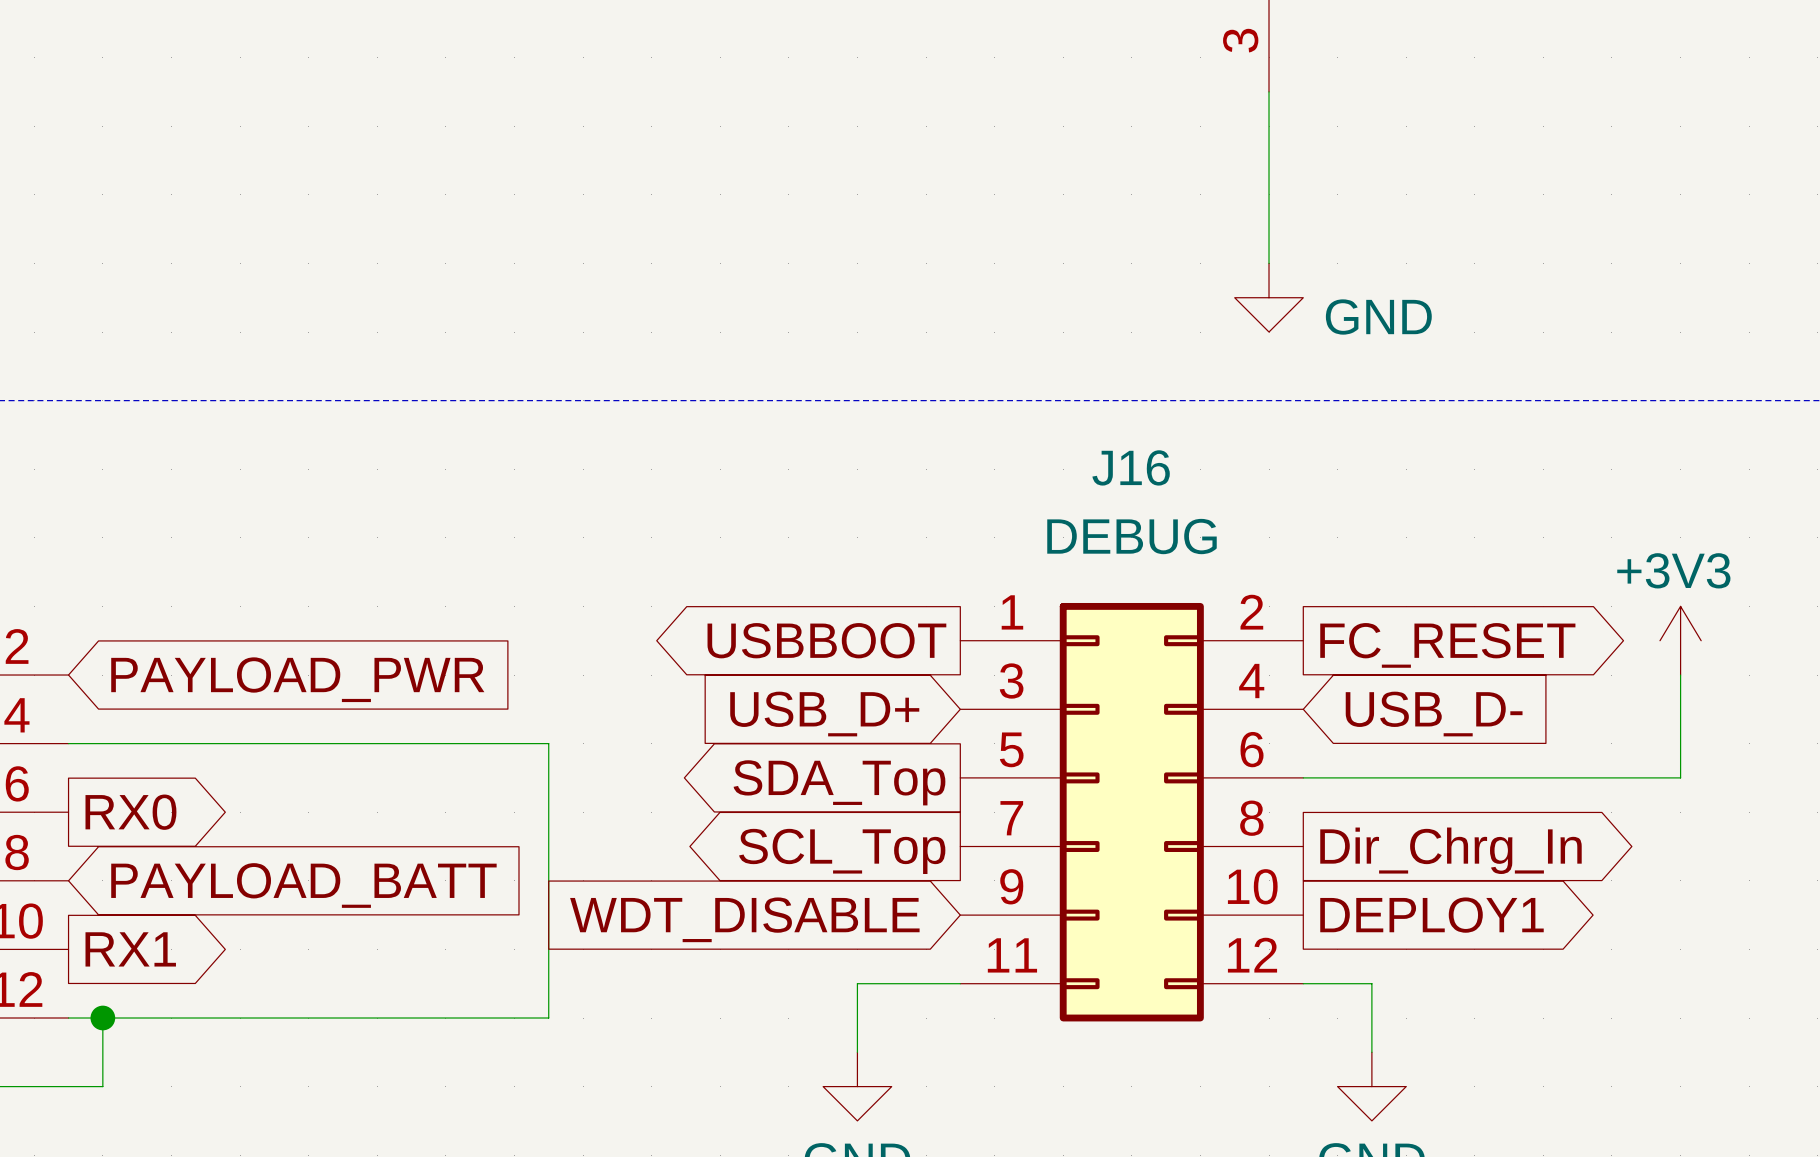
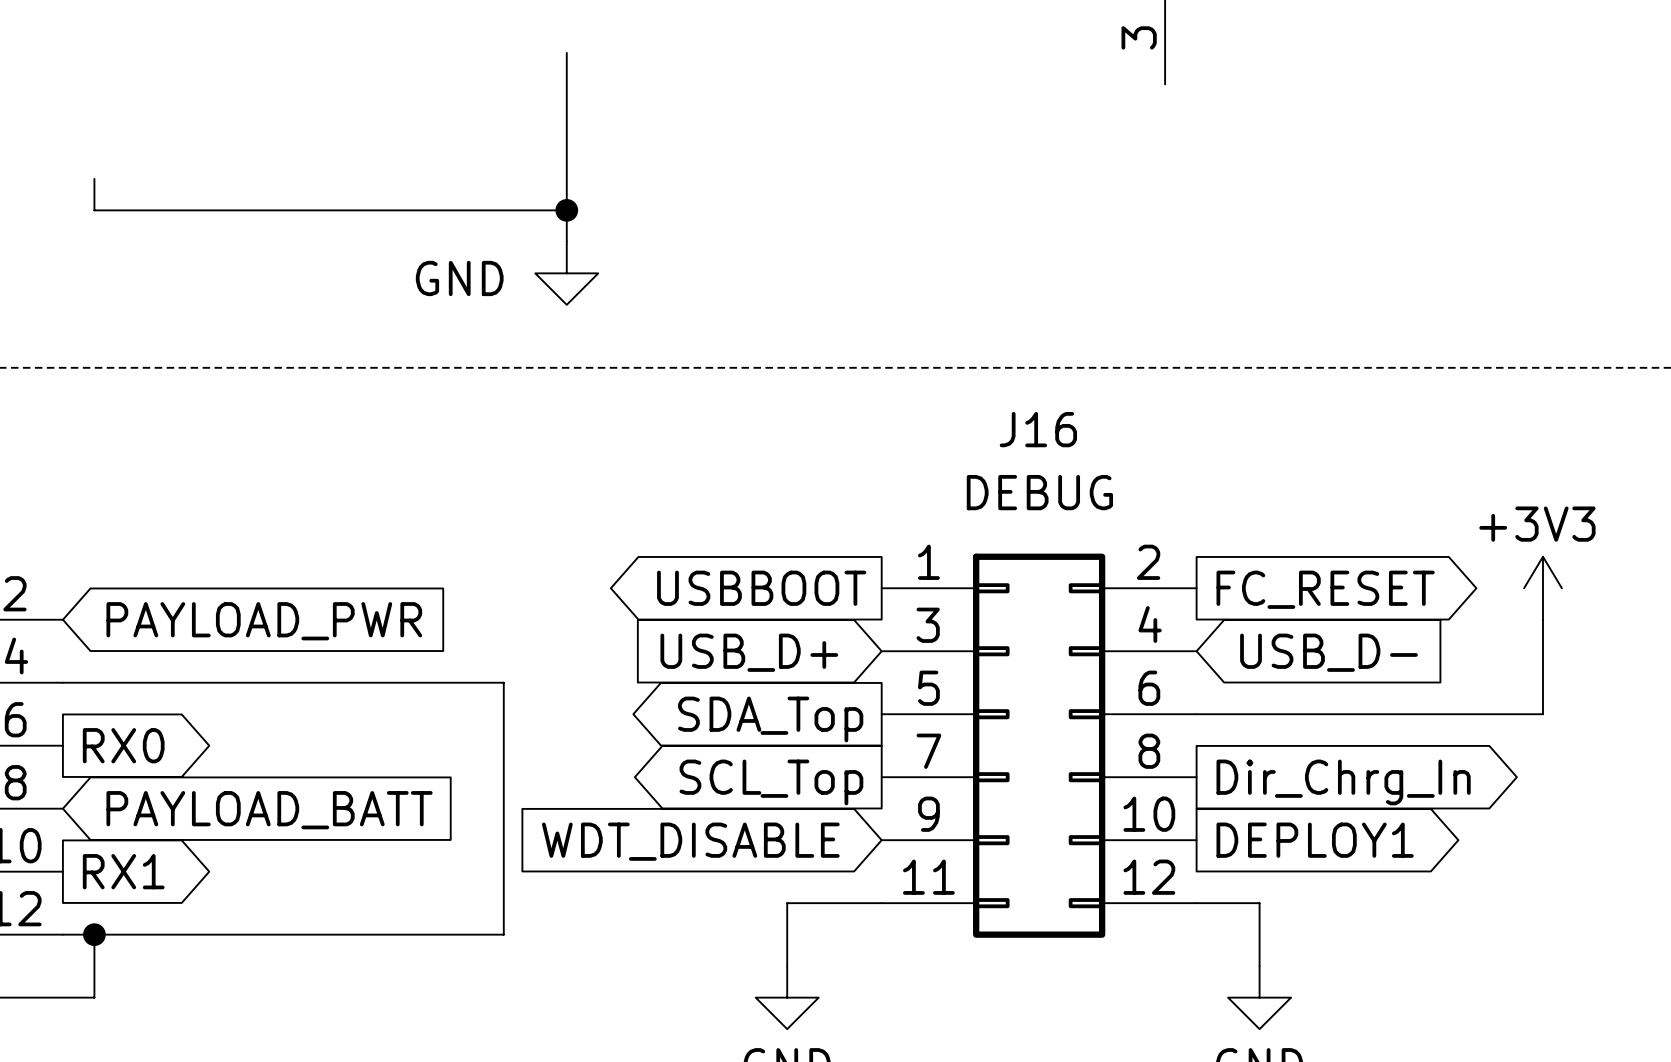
wire: none -> (566, 52) (566, 241)
wire: (1269, 91) (1269, 263) -> none
wire: none -> (94, 178) (94, 210) (566, 210)
junction: none -> (566, 210)
power symbol position: GND (1269, 297) -> GND (566, 273)
power symbol text position: GND (1378, 317) -> GND (459, 278)

